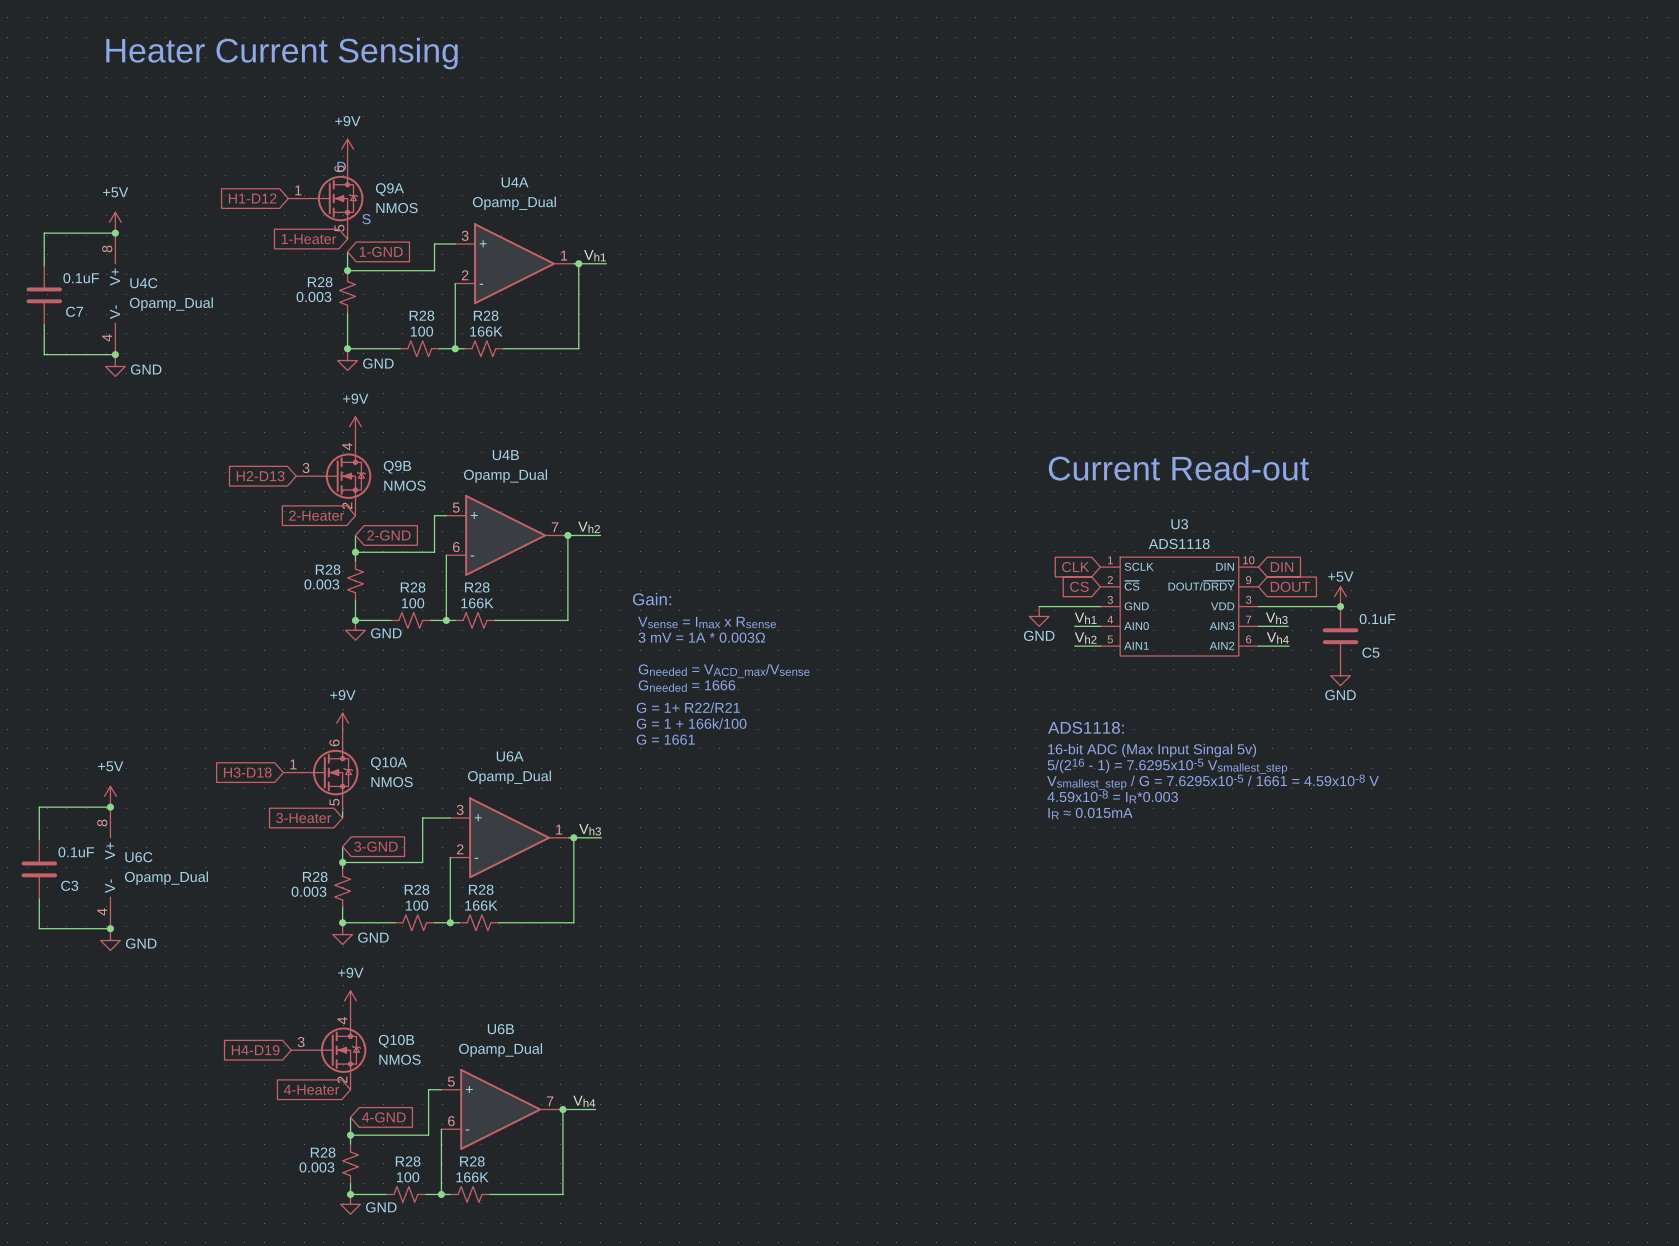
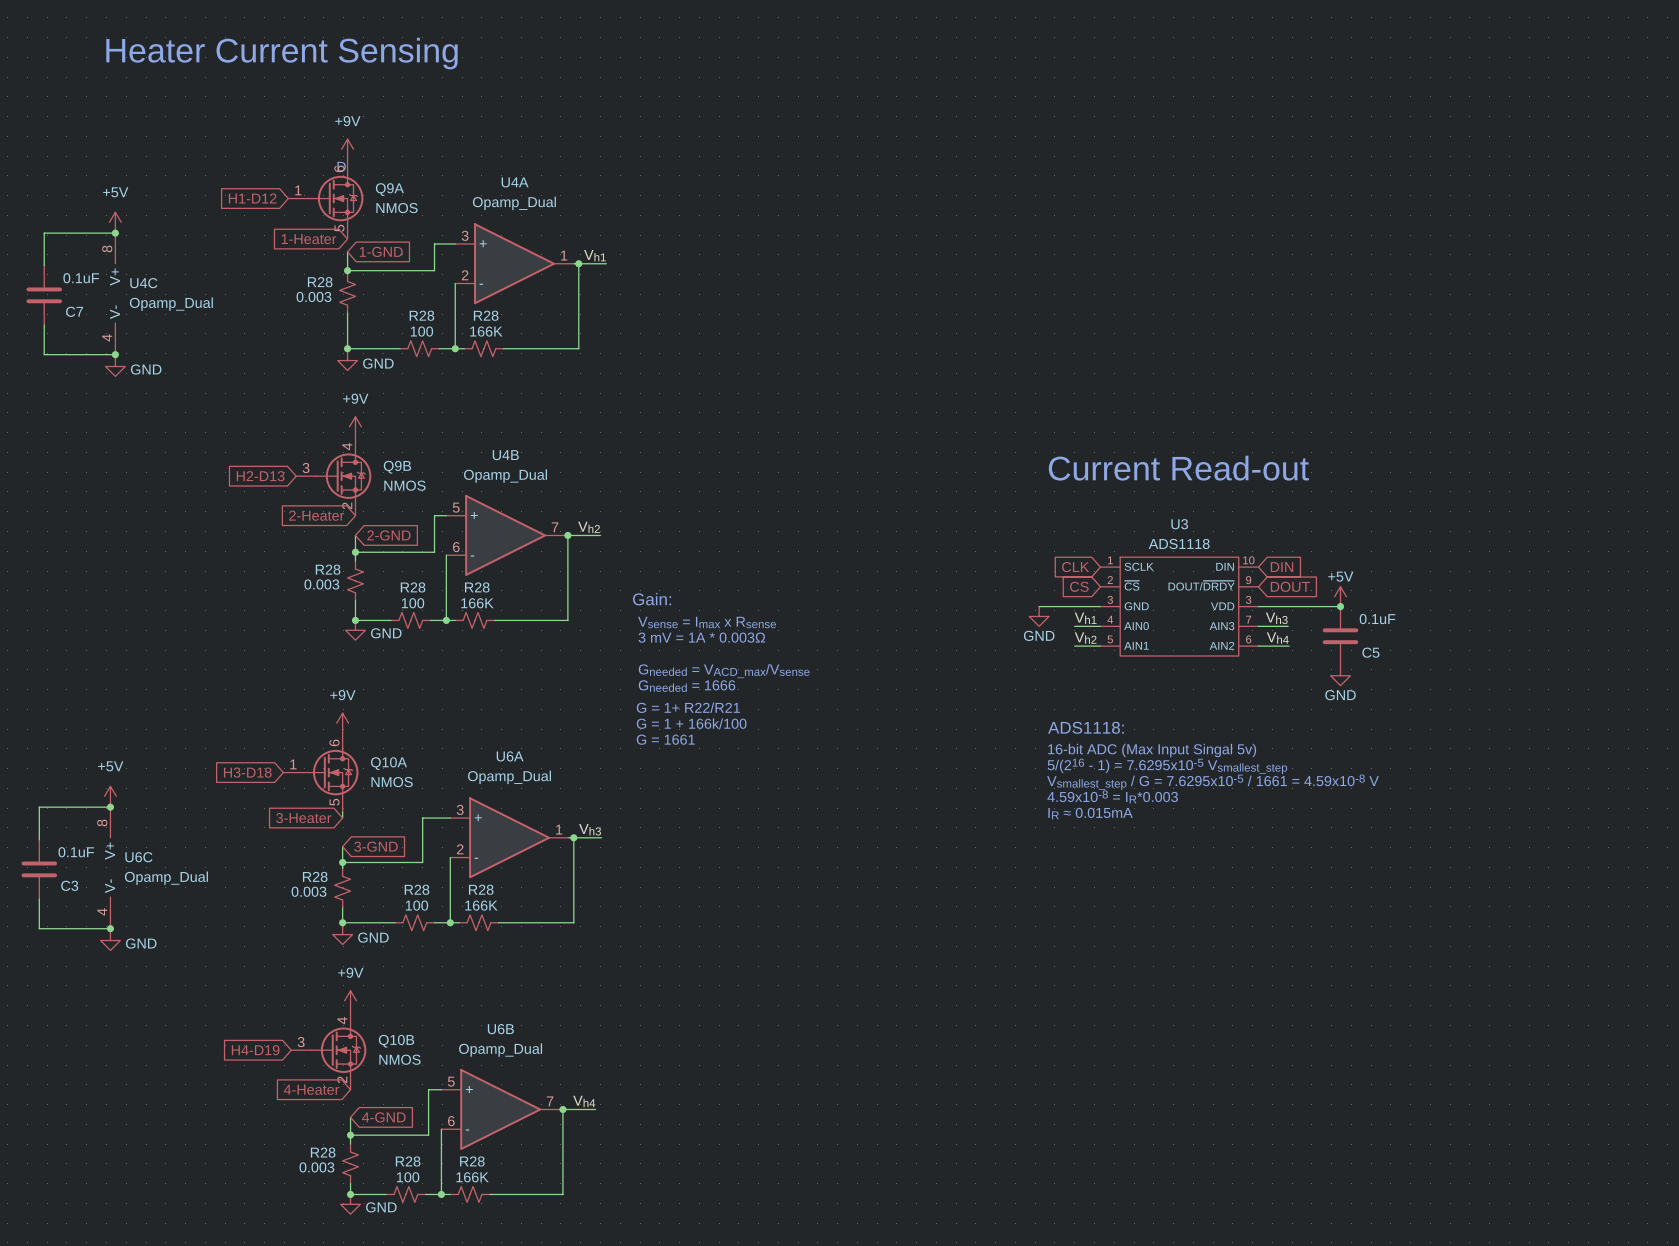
text: S (366, 219) -> none

